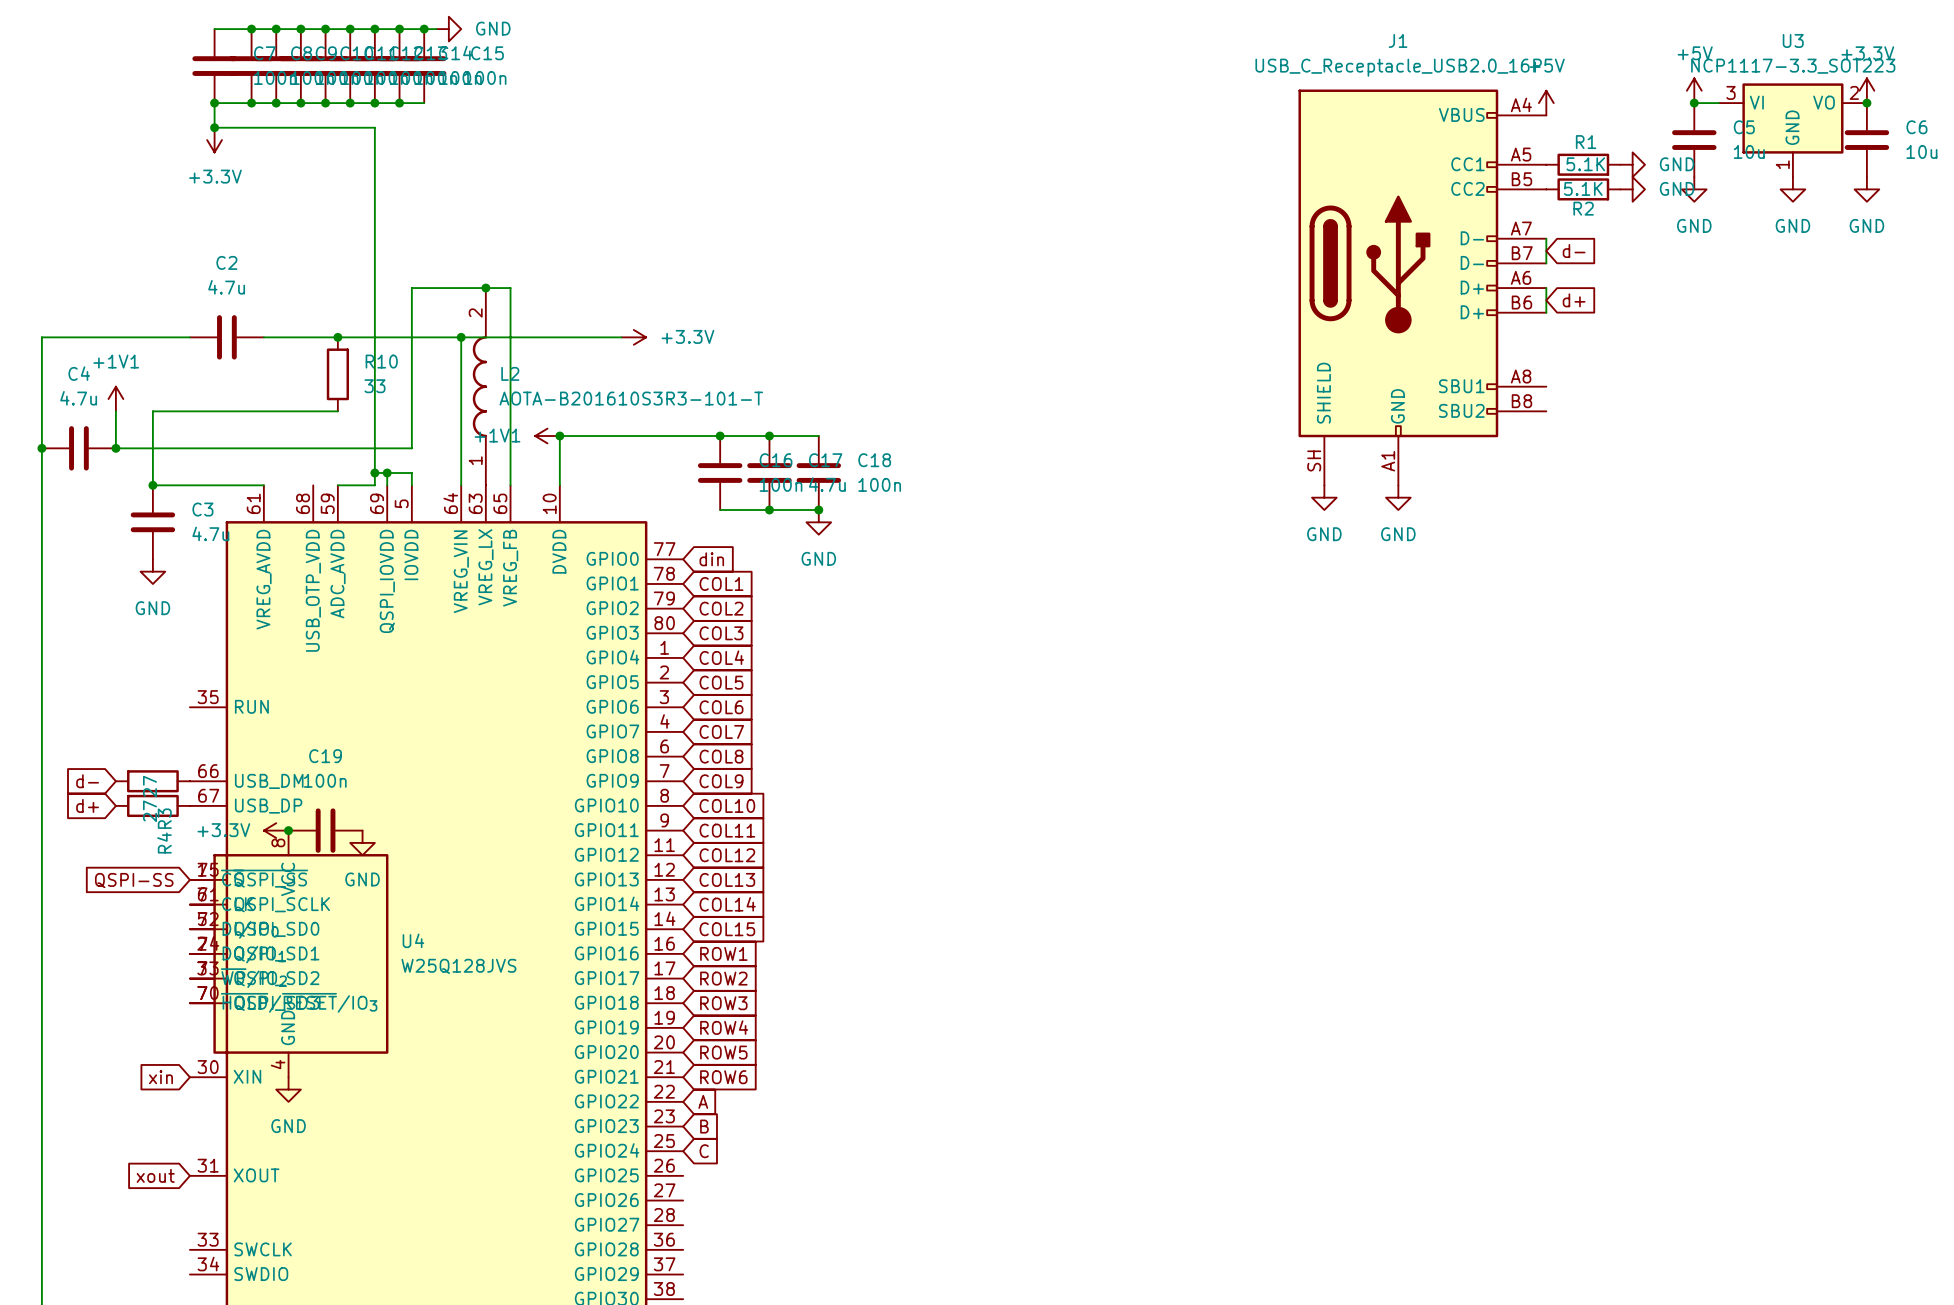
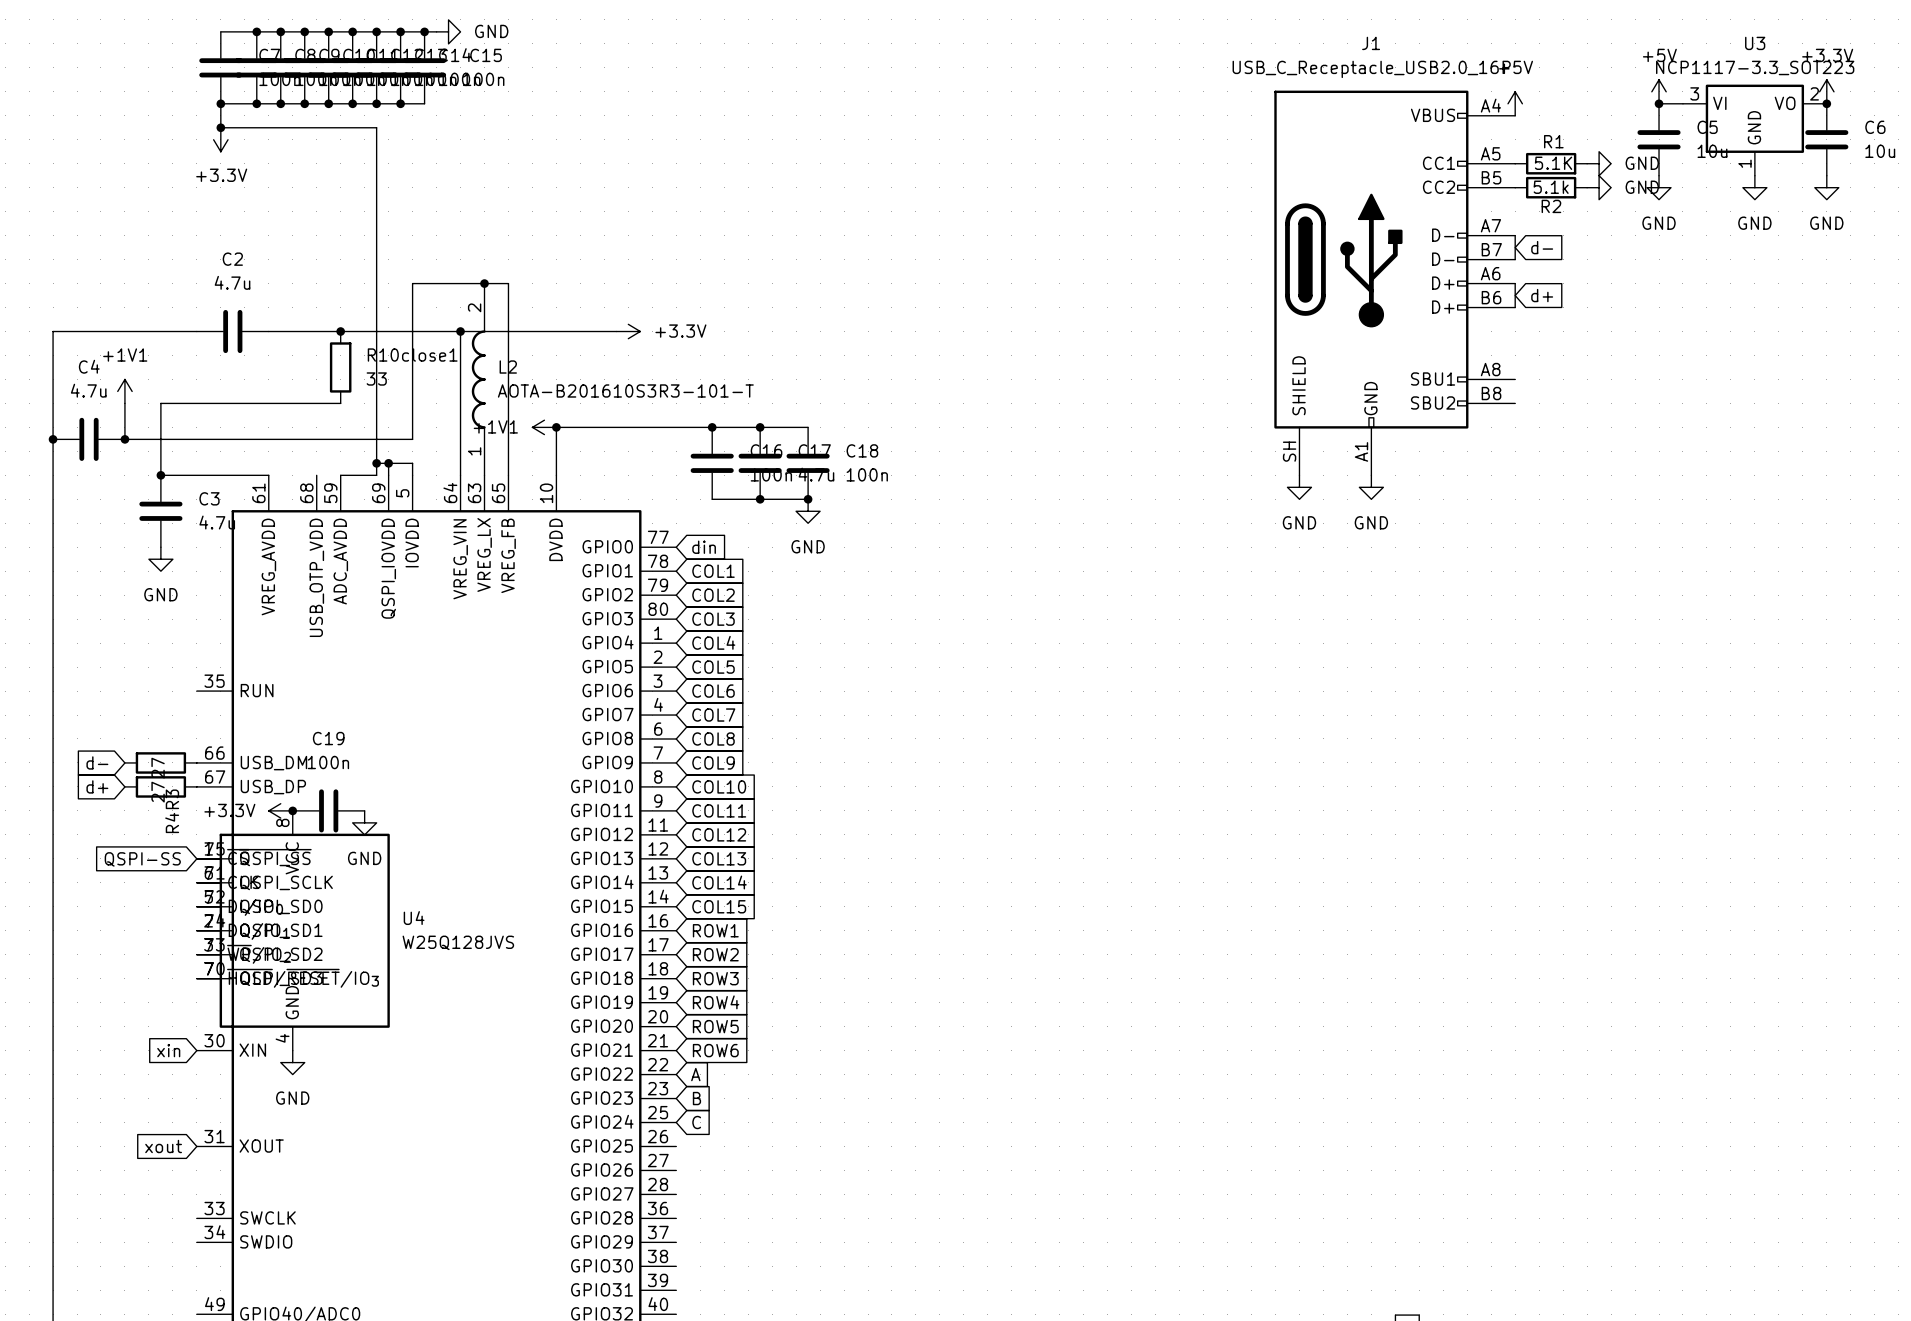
R2 value: 5.1K (1583, 188) -> 5.1k (1551, 187)
R10 name: R10 (381, 361) -> R10close1 (412, 355)

